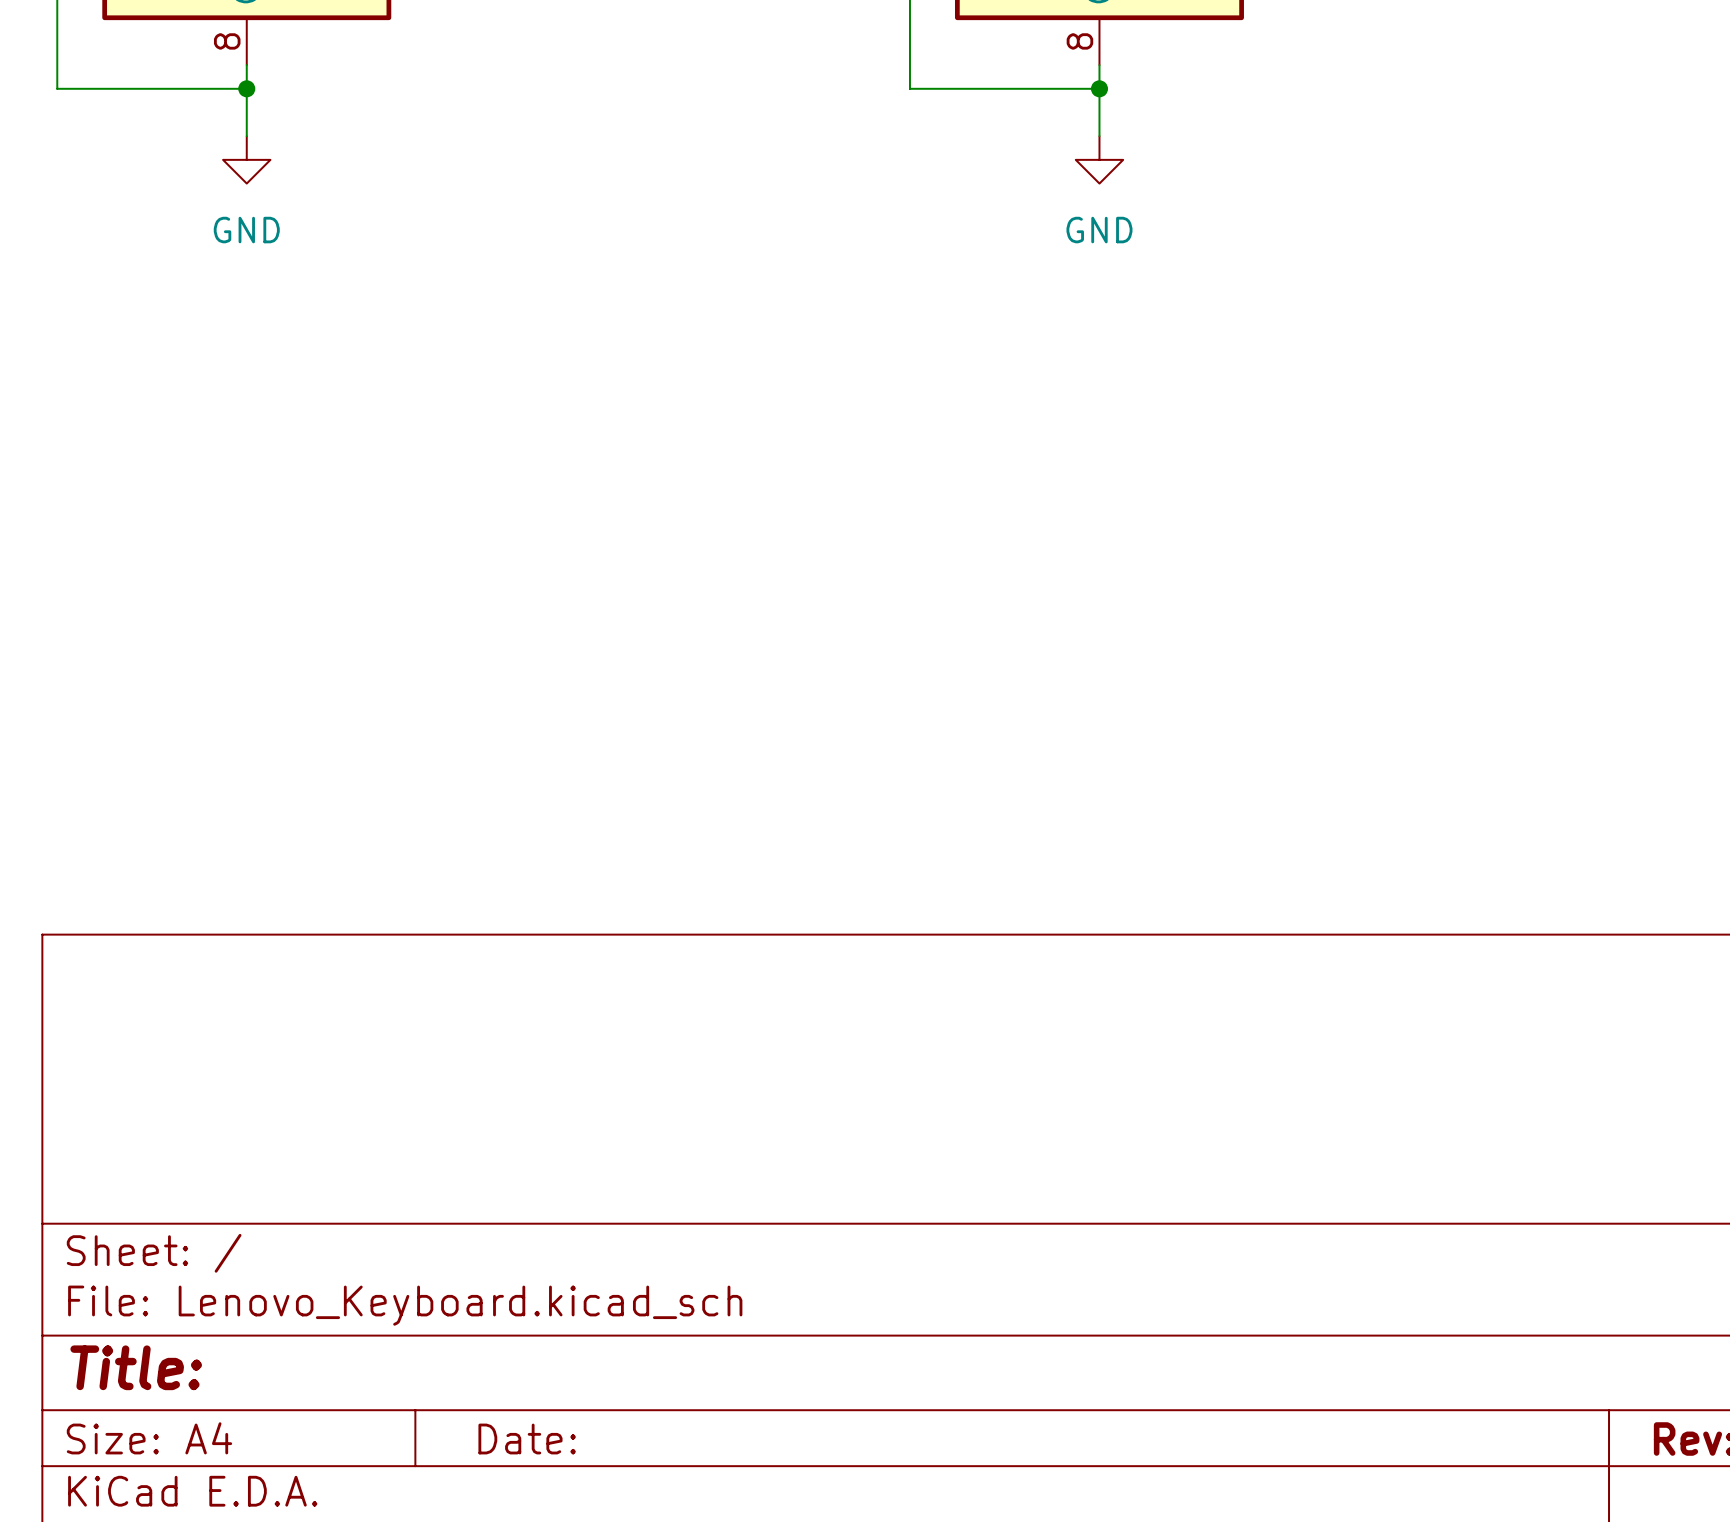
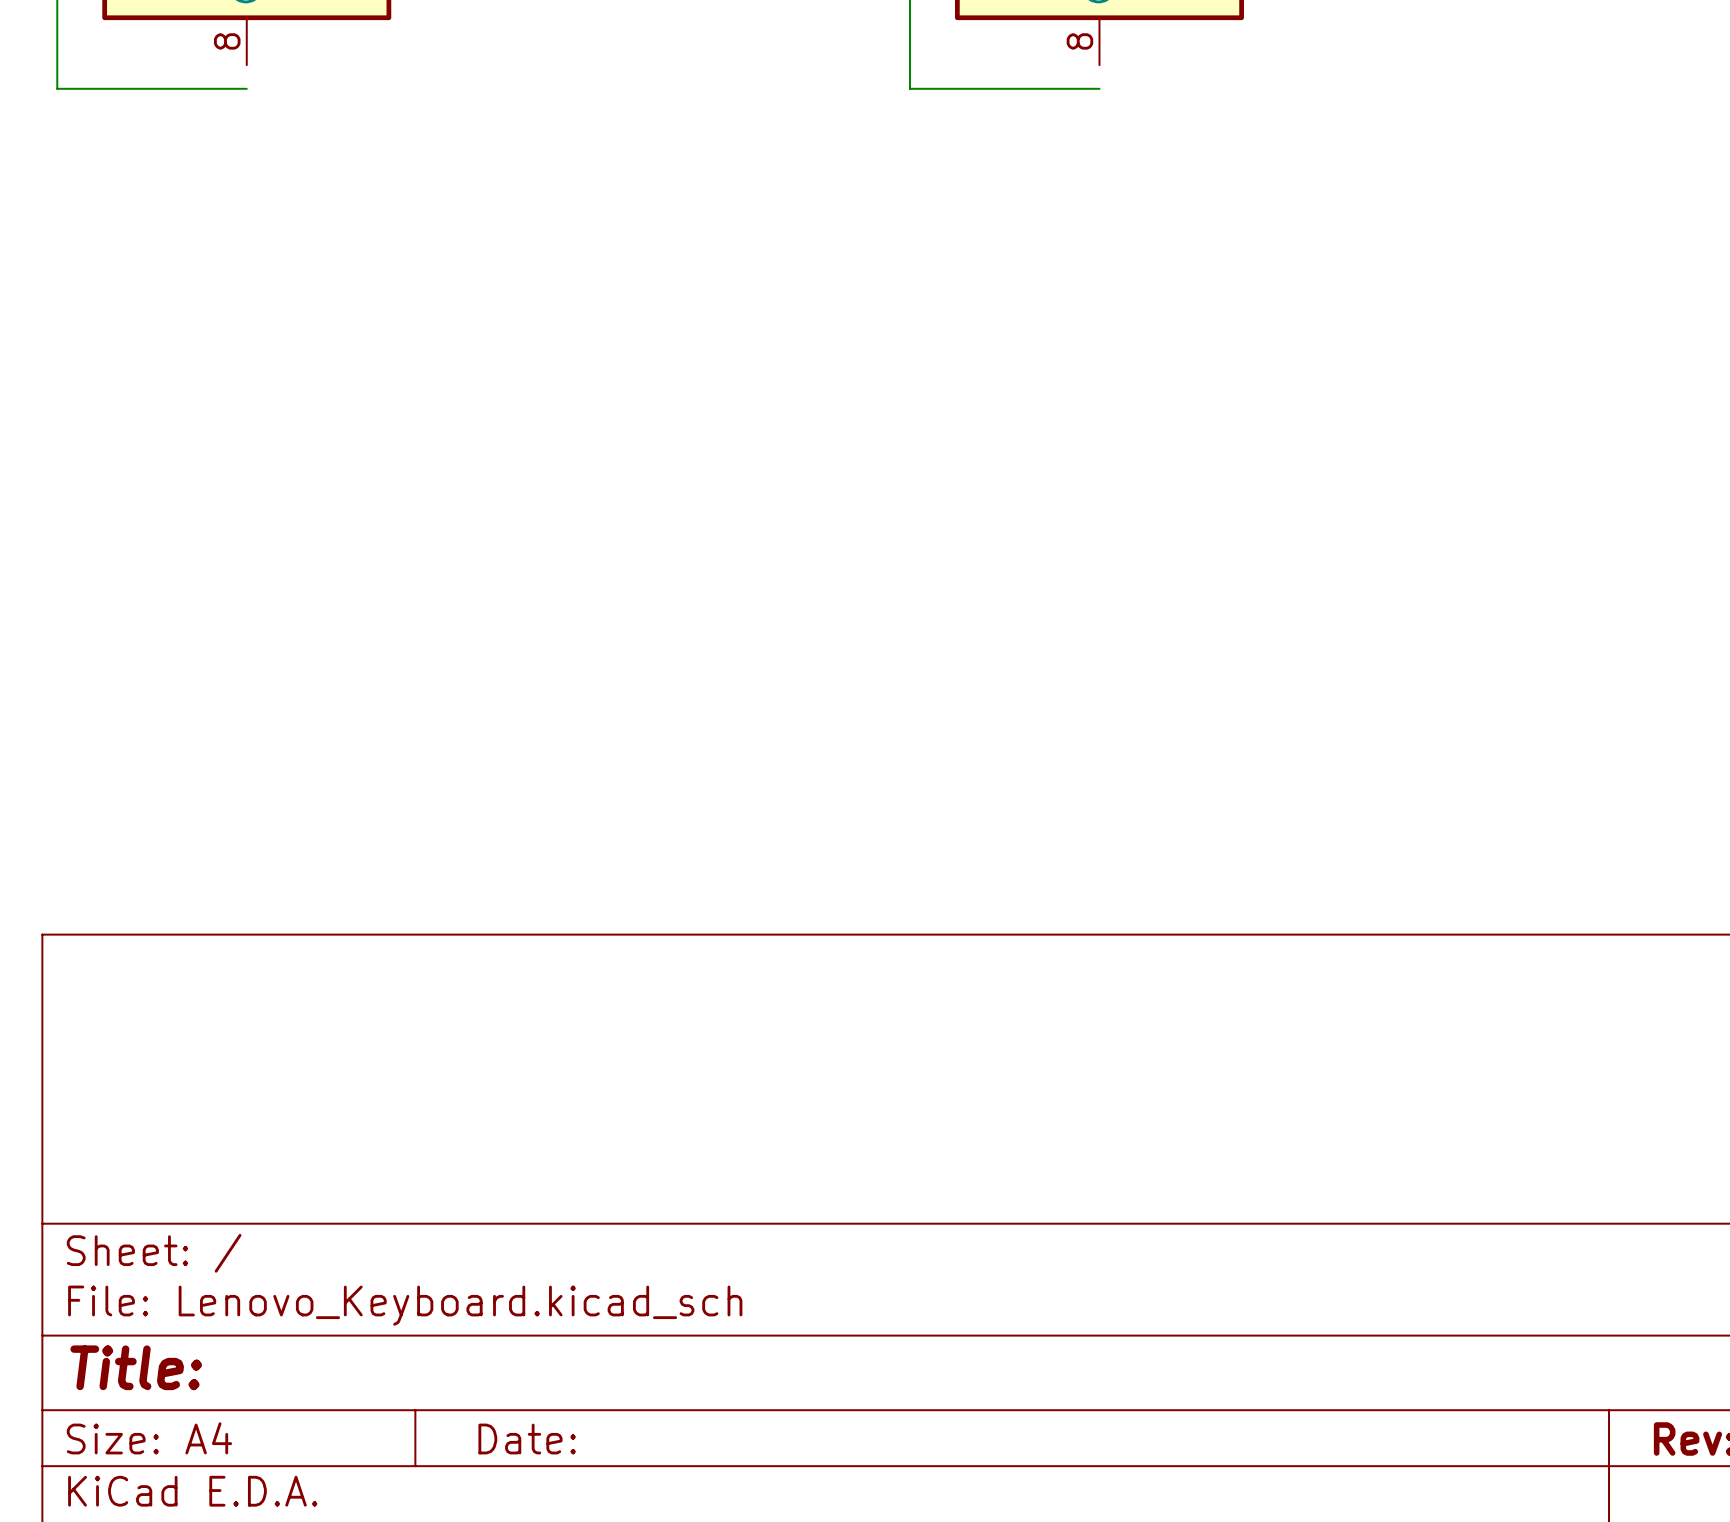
wire: (246, 65) (246, 136) -> none
wire: (1099, 65) (1099, 136) -> none
junction: (246, 88) -> none
junction: (1099, 88) -> none
power symbol: GND (246, 159) -> none
power symbol: GND (1099, 159) -> none

